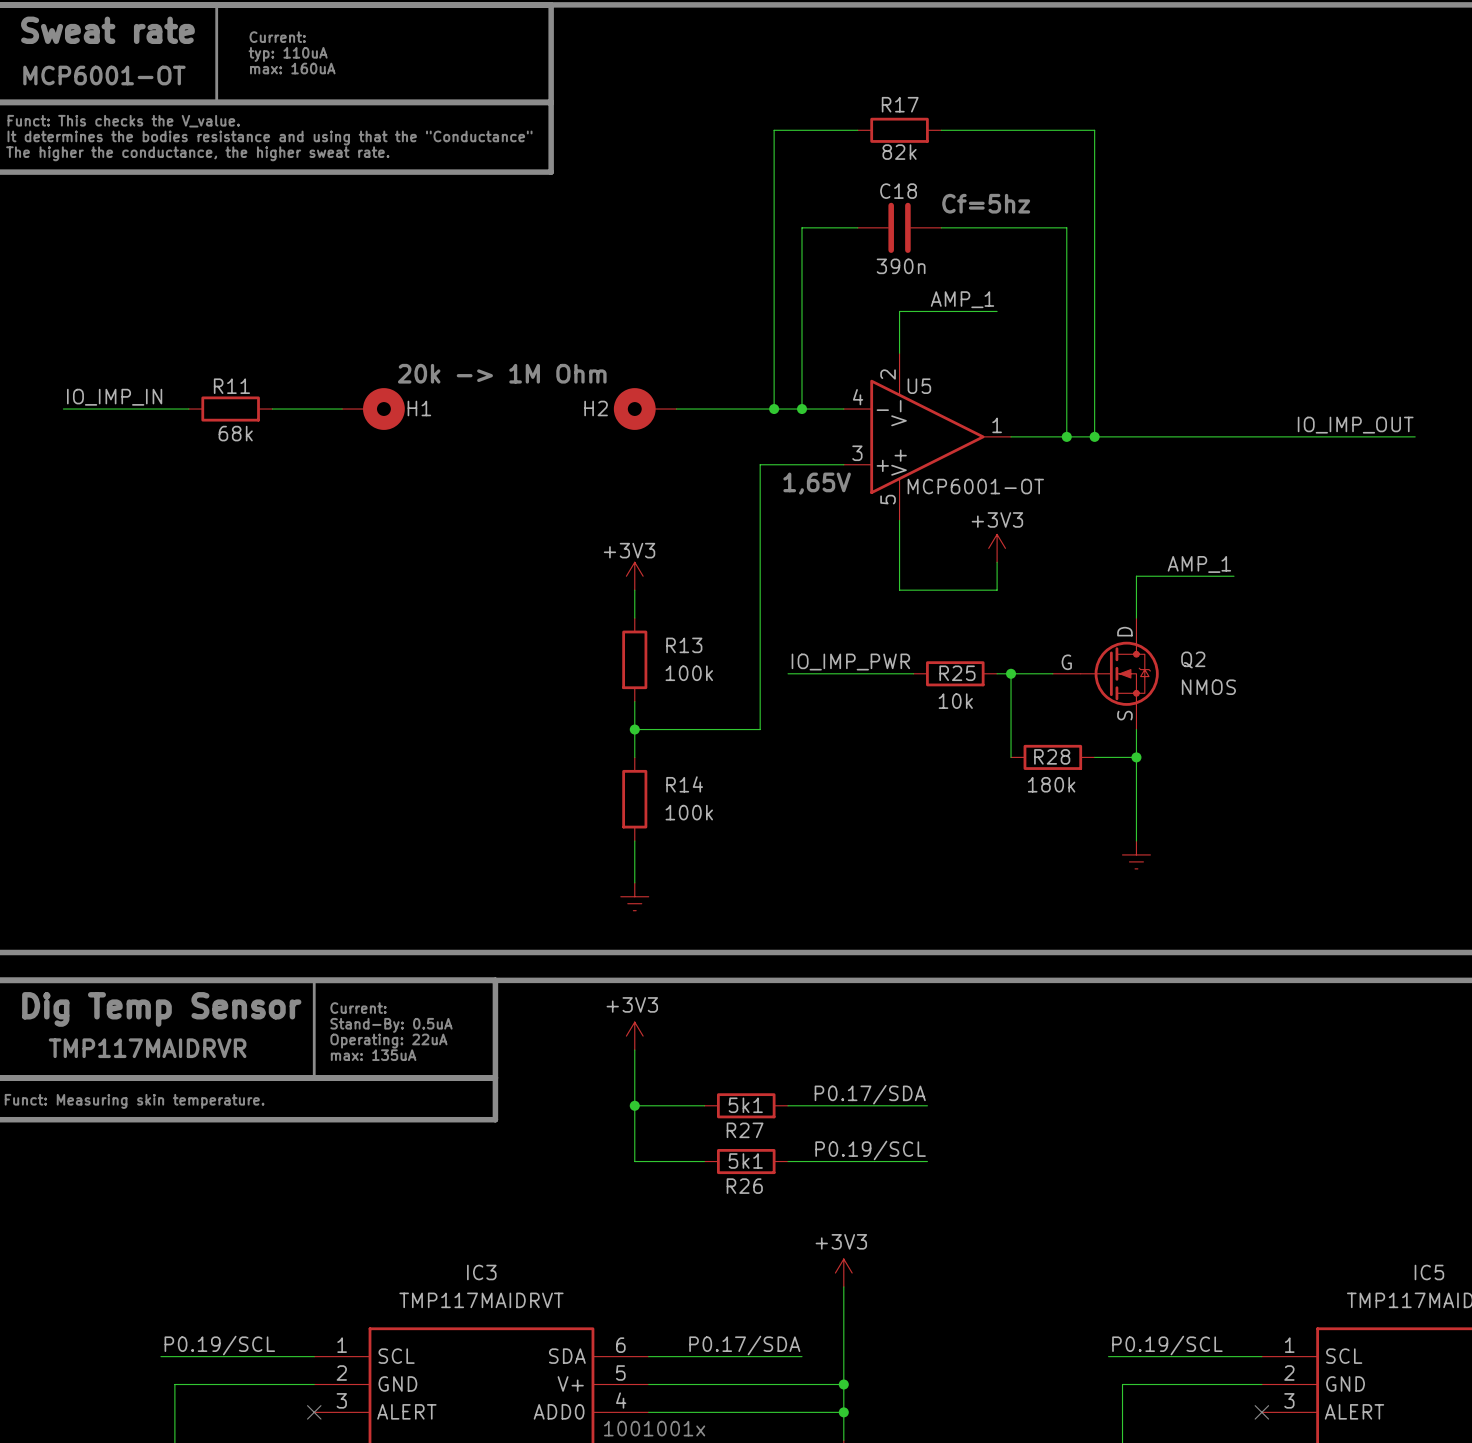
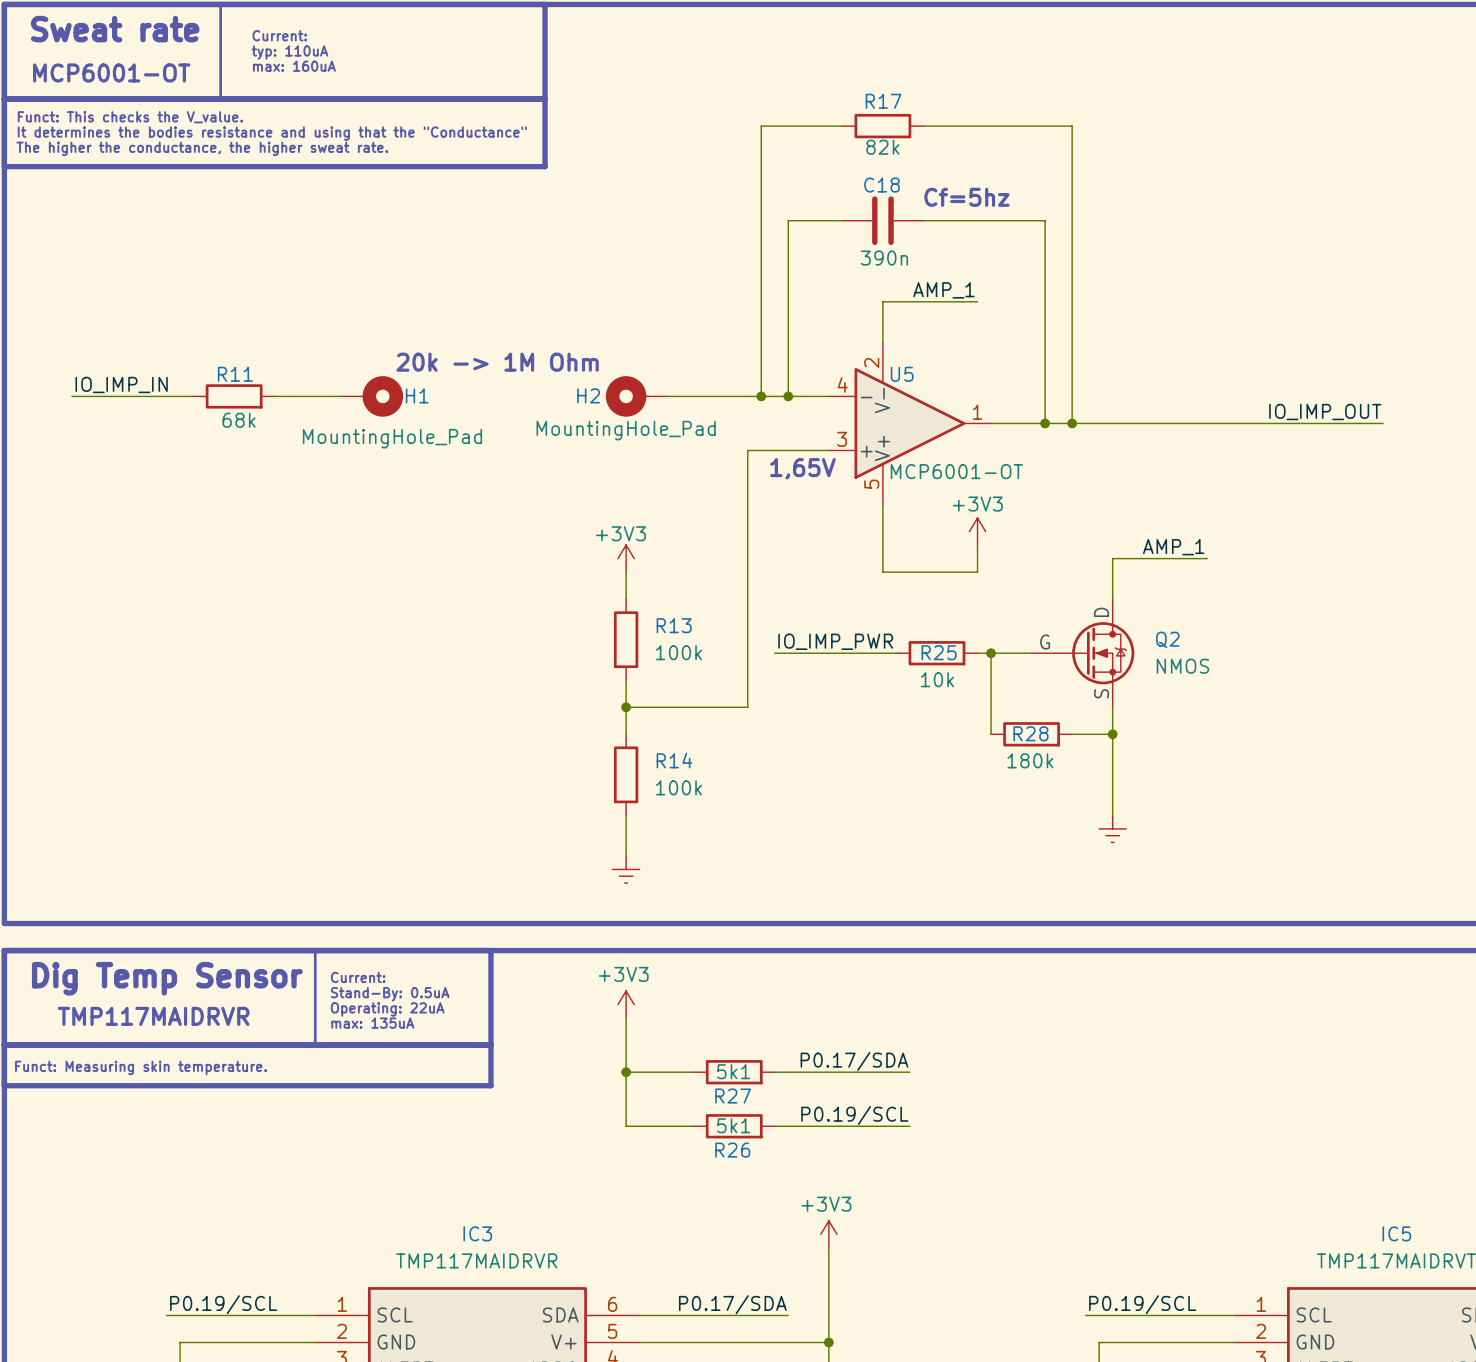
H2 value: none -> MountingHole_Pad (626, 430)
H1 value: none -> MountingHole_Pad (392, 438)
IC3 value: TMP117MAIDRVT (481, 1300) -> TMP117MAIDRVR (476, 1260)

